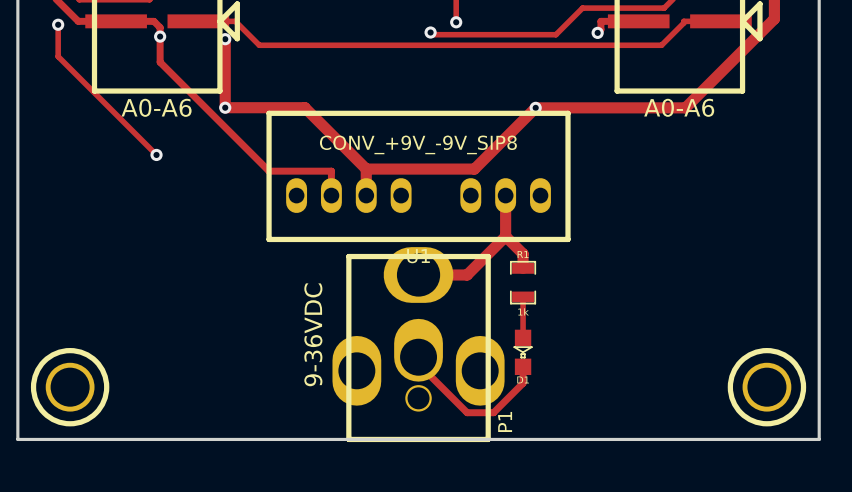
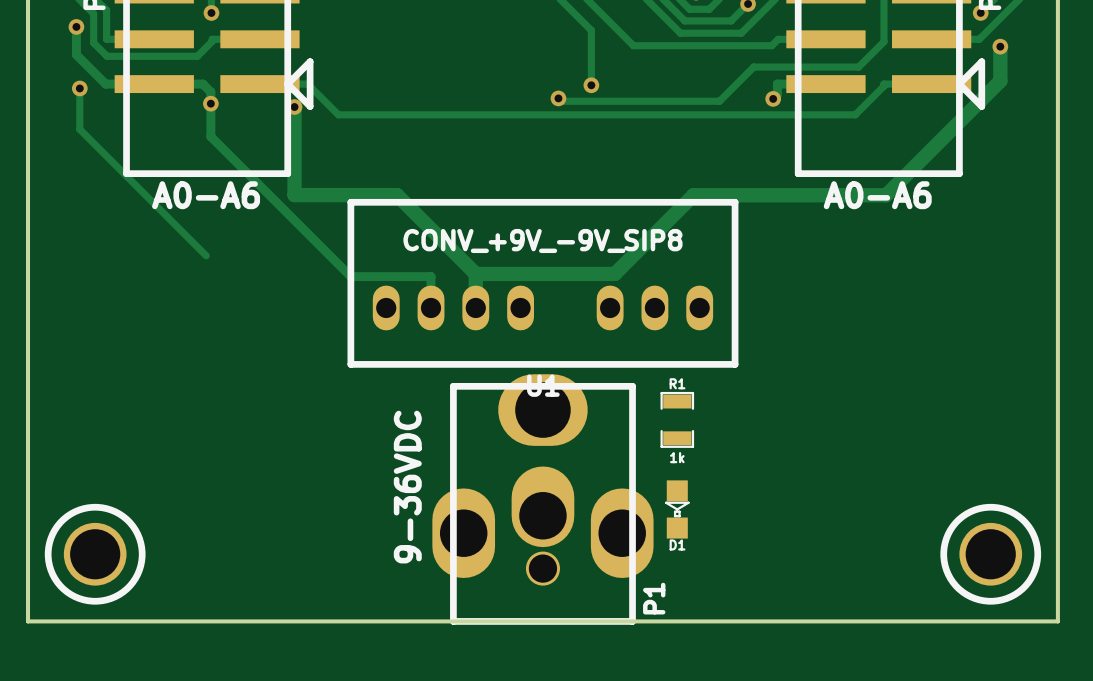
via: (225, 107) -> none
via: (535, 107) -> none
via: (156, 154) -> none
track: (505, 195) (505, 236) -> none
track: (505, 236) (467, 274) (418, 274) -> none
track: (505, 236) (523, 253) (523, 268) -> none
track: (523, 296) (523, 337) -> none
track: (418, 357) (418, 364) (467, 412) (493, 412) (523, 383) (523, 366) -> none

